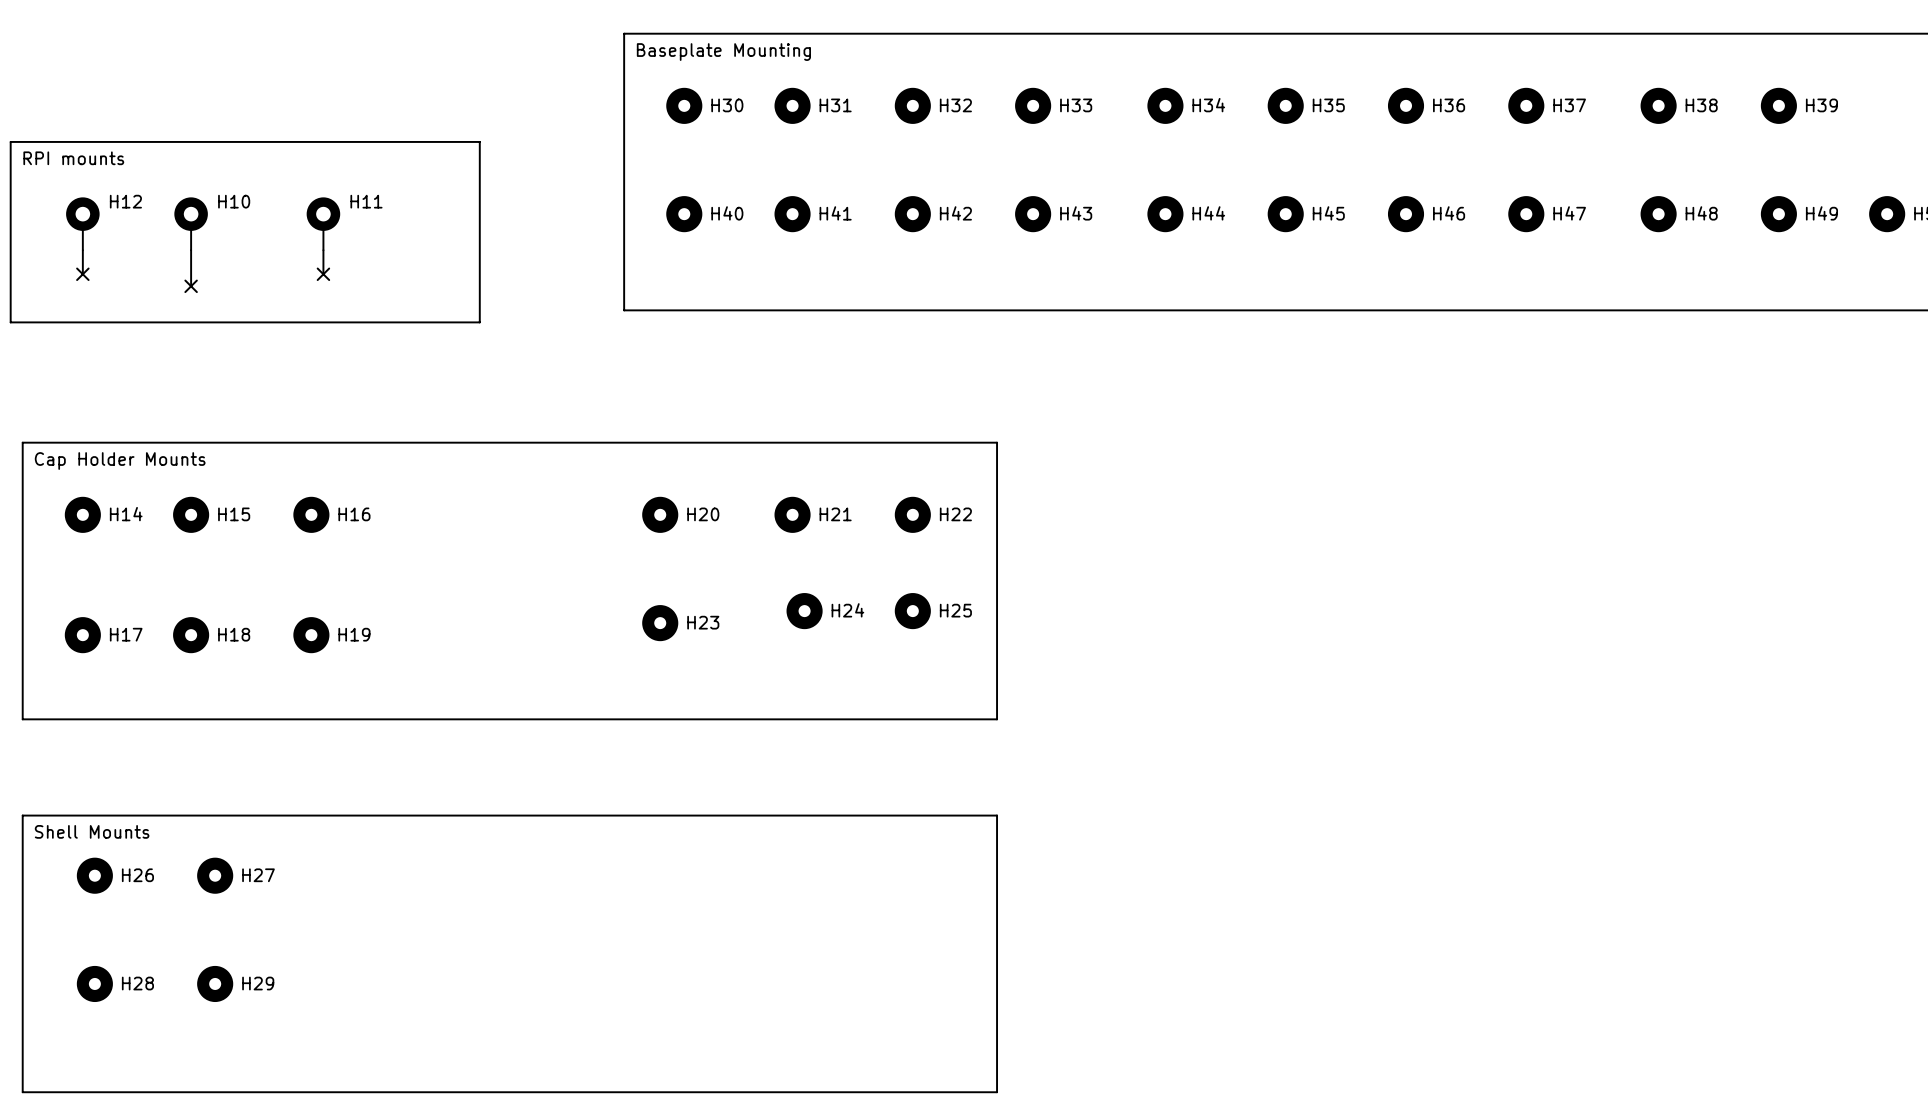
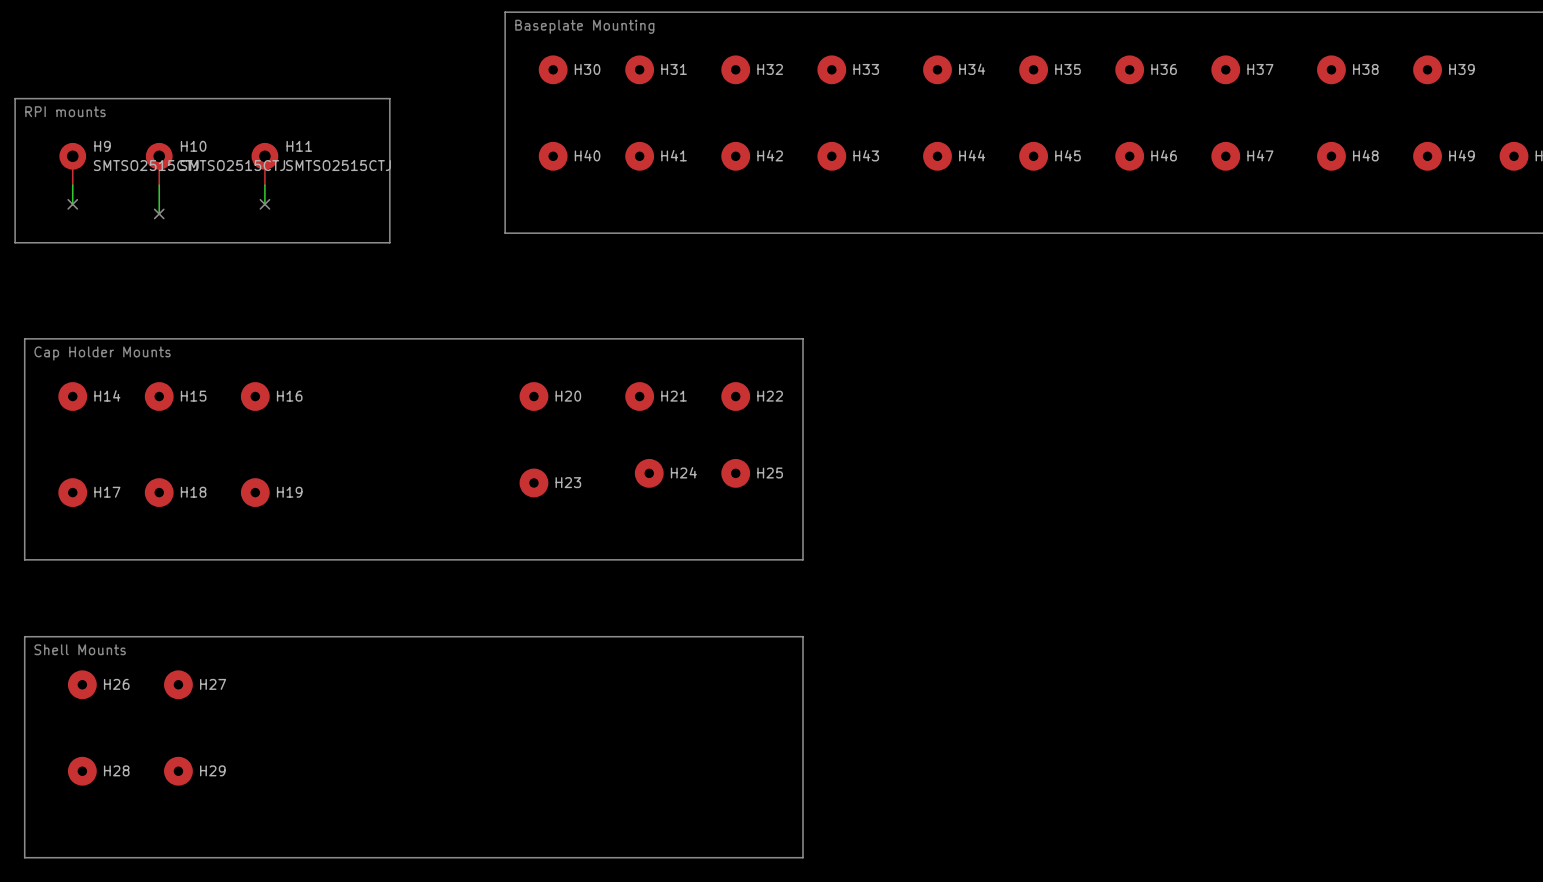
H12 name: H12 (125, 201) -> H9 (102, 146)
H12 value: none -> SMTSO2515CTJ (146, 165)
H10 value: none -> SMTSO2515CTJ (232, 165)
H11 value: none -> SMTSO2515CTJ (338, 165)

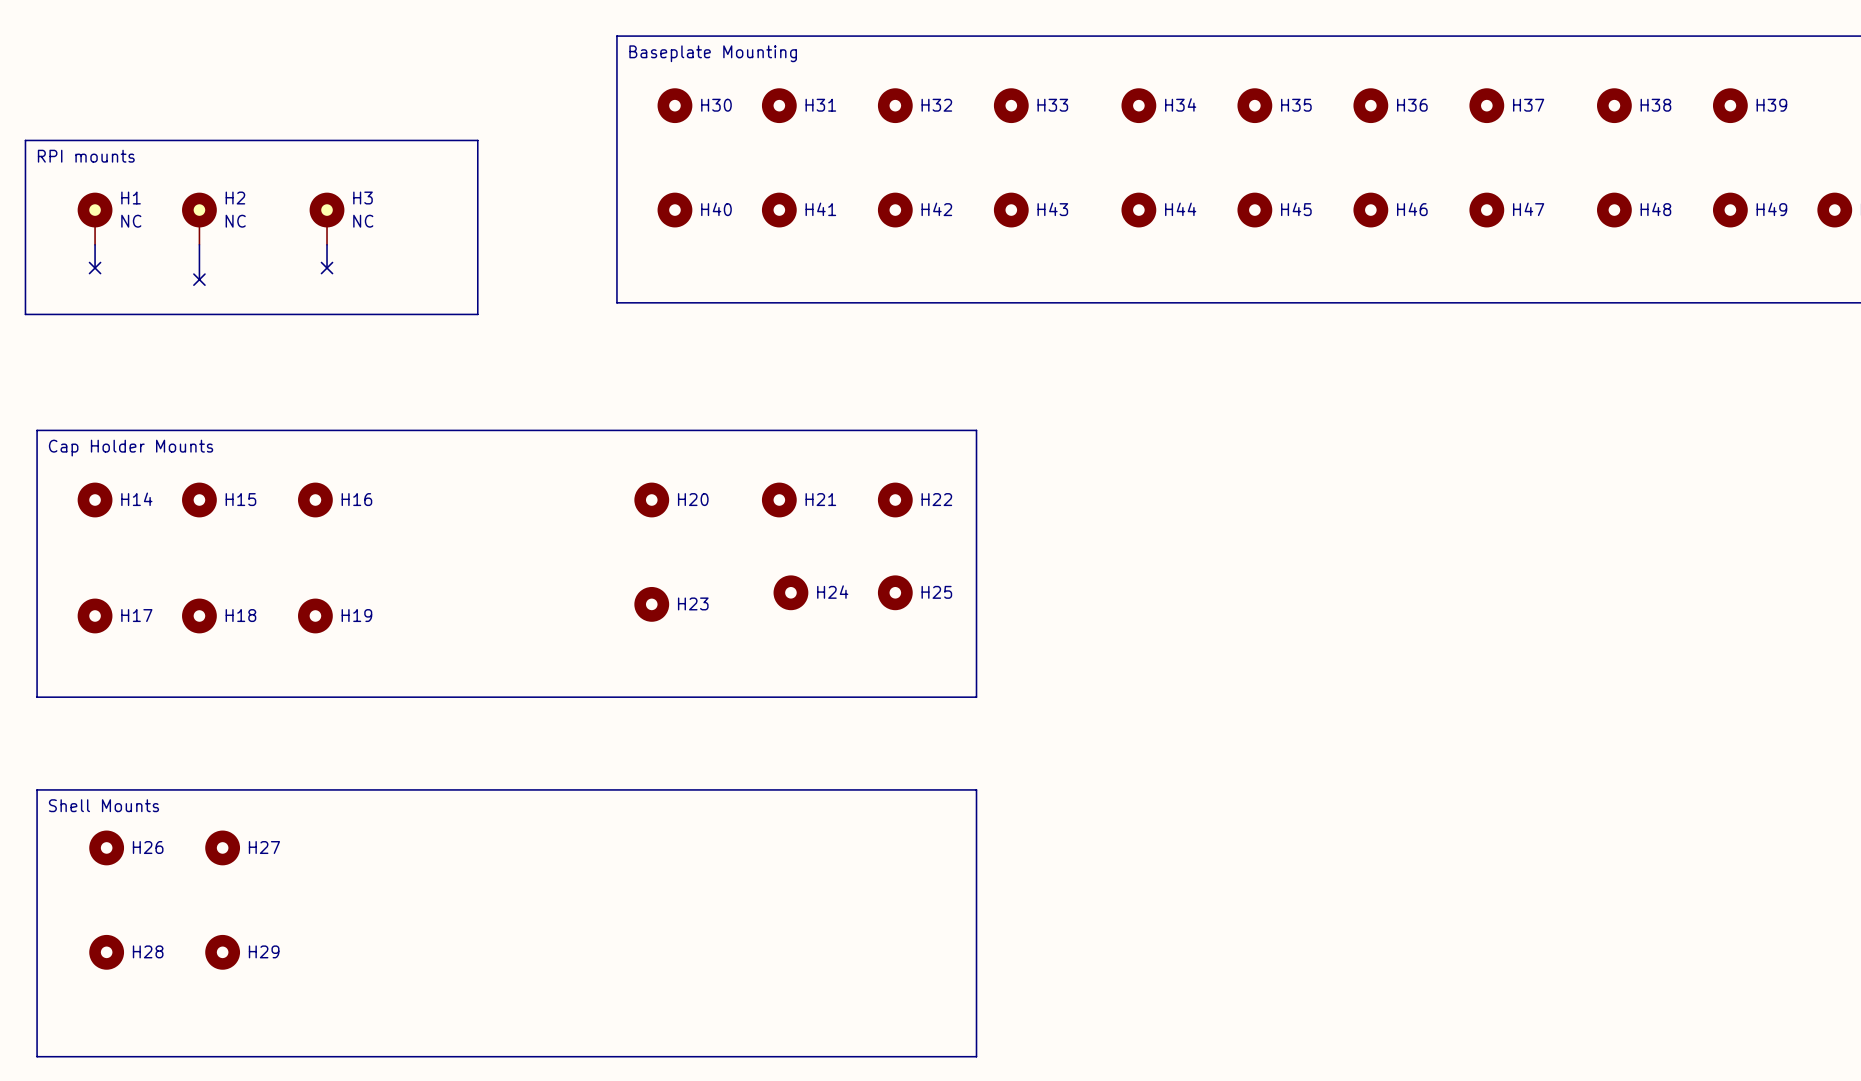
H1: none -> NC (95, 218)
H2: none -> NC (199, 218)
H3: none -> NC (327, 218)
H9: SMTSO2515CTJ (72, 164) -> none
H10: SMTSO2515CTJ (159, 164) -> none
H11: SMTSO2515CTJ (264, 164) -> none

